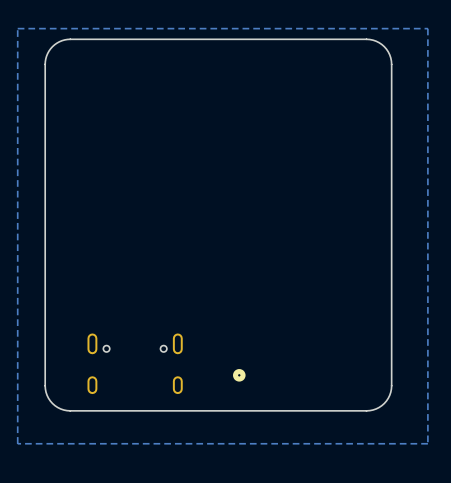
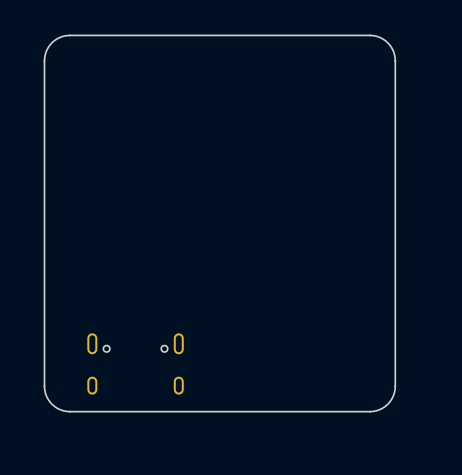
zone outline: (427, 28) (427, 443) (17, 443) (17, 28) (427, 28) -> none
part: (239, 375) -> none

